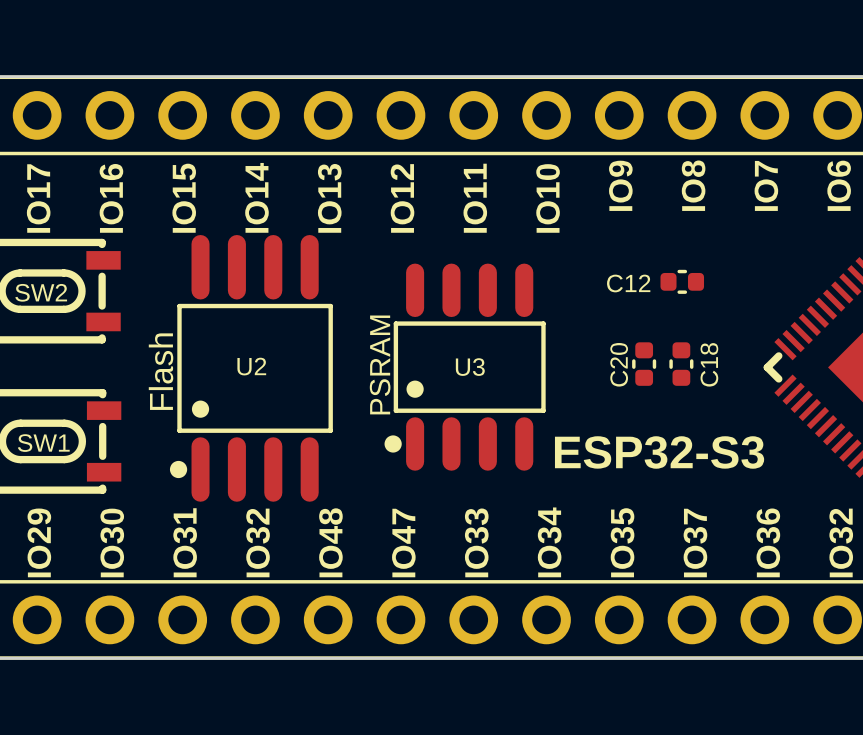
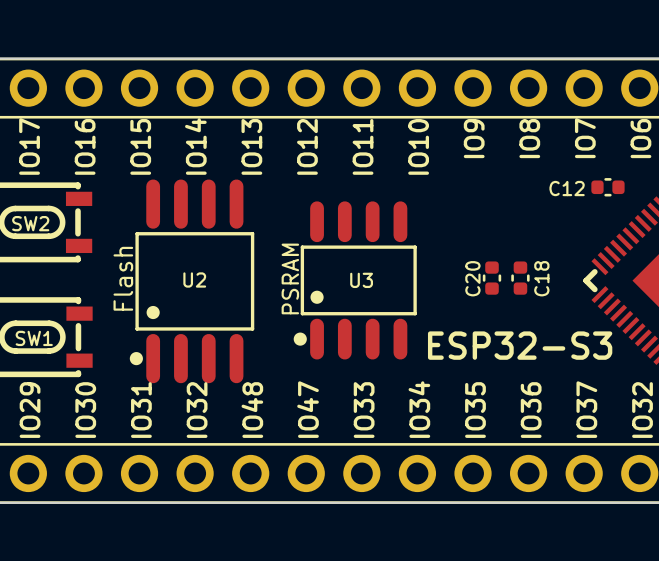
C12 position: (682, 281) -> (607, 187)
text: IO36 (768, 542) -> IO37 (586, 409)
text: IO37 (695, 543) -> IO36 (531, 410)

